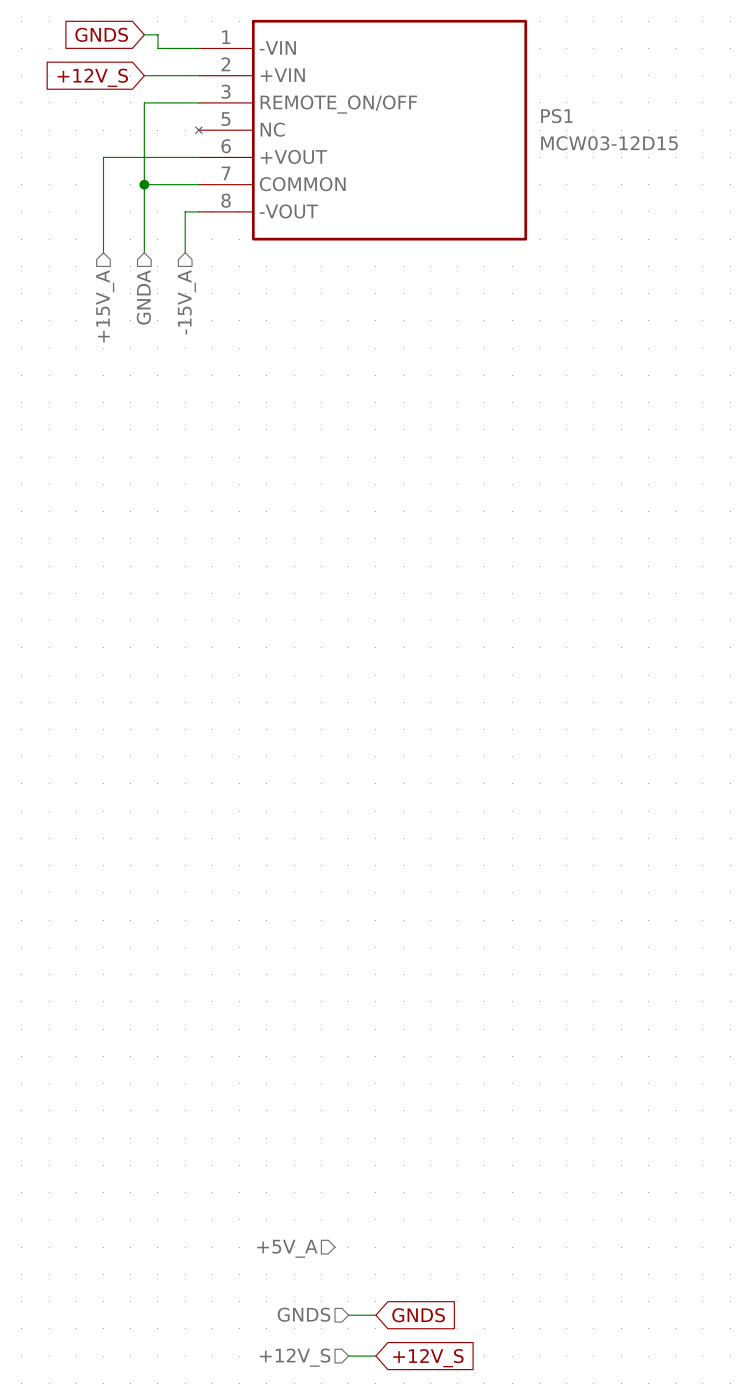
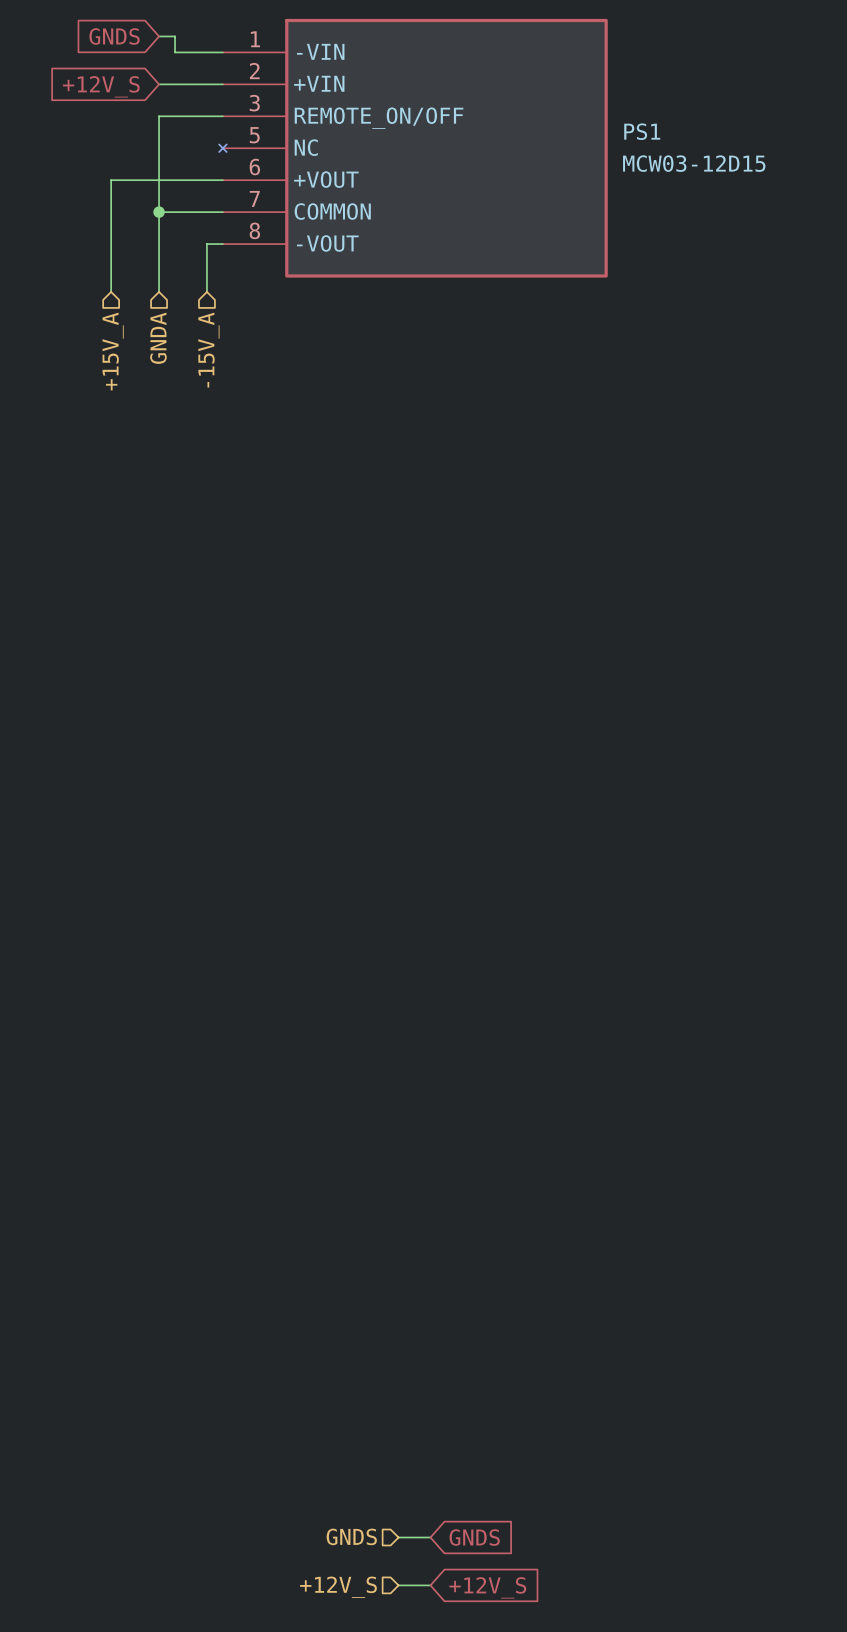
hierarchical label: +5V_A (287, 1248) -> none

